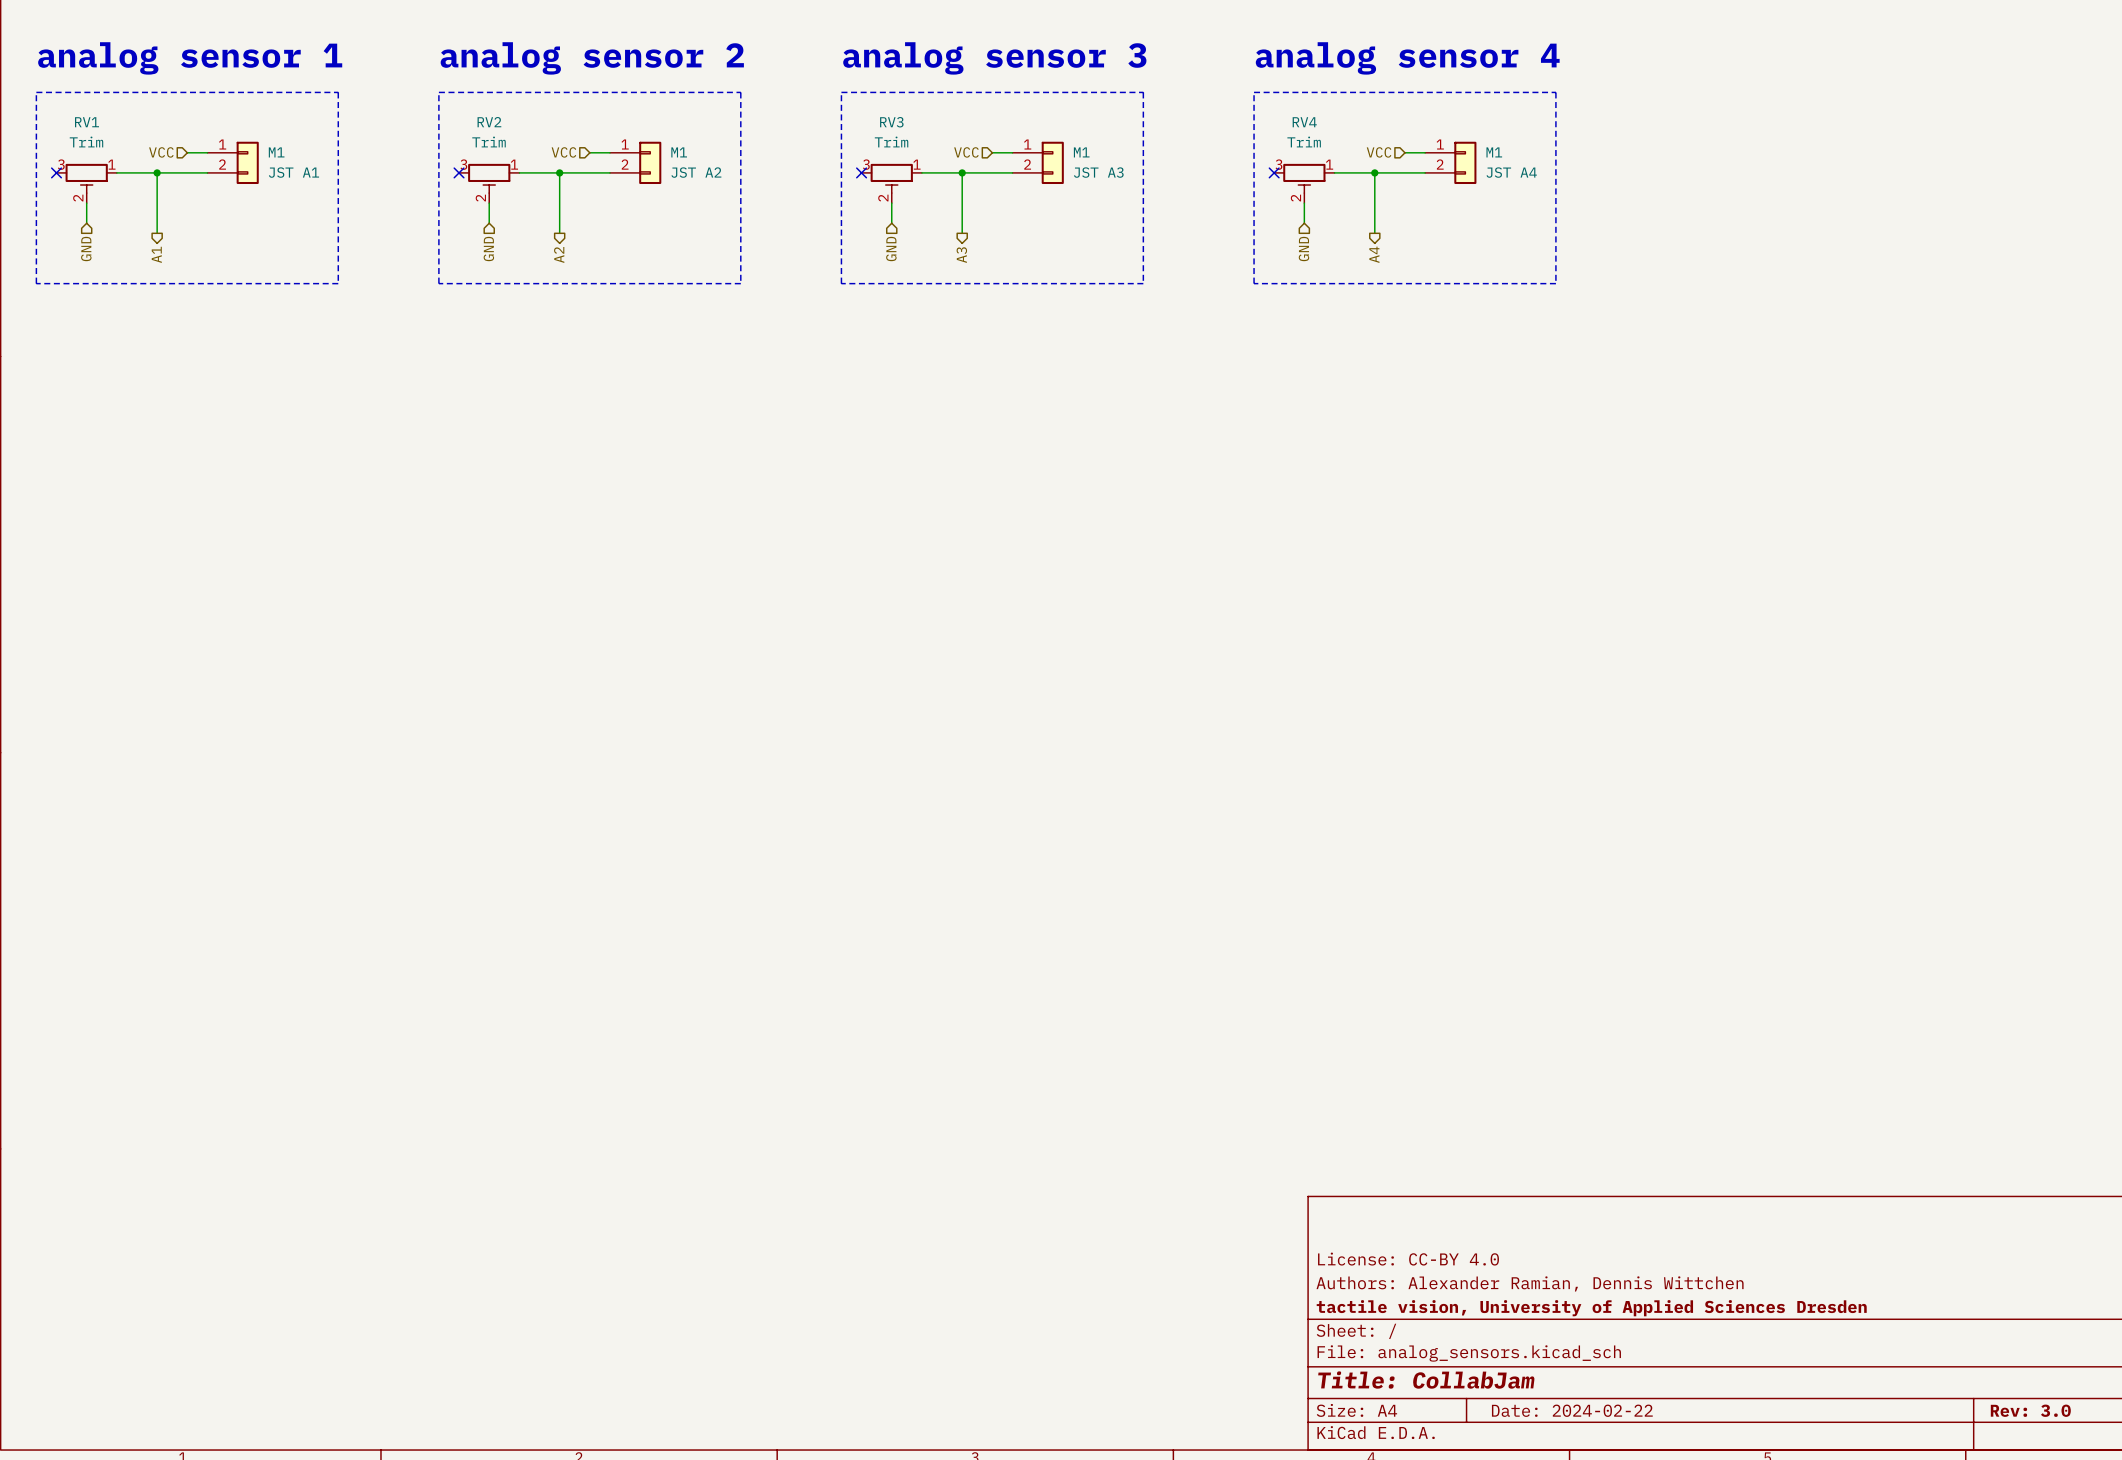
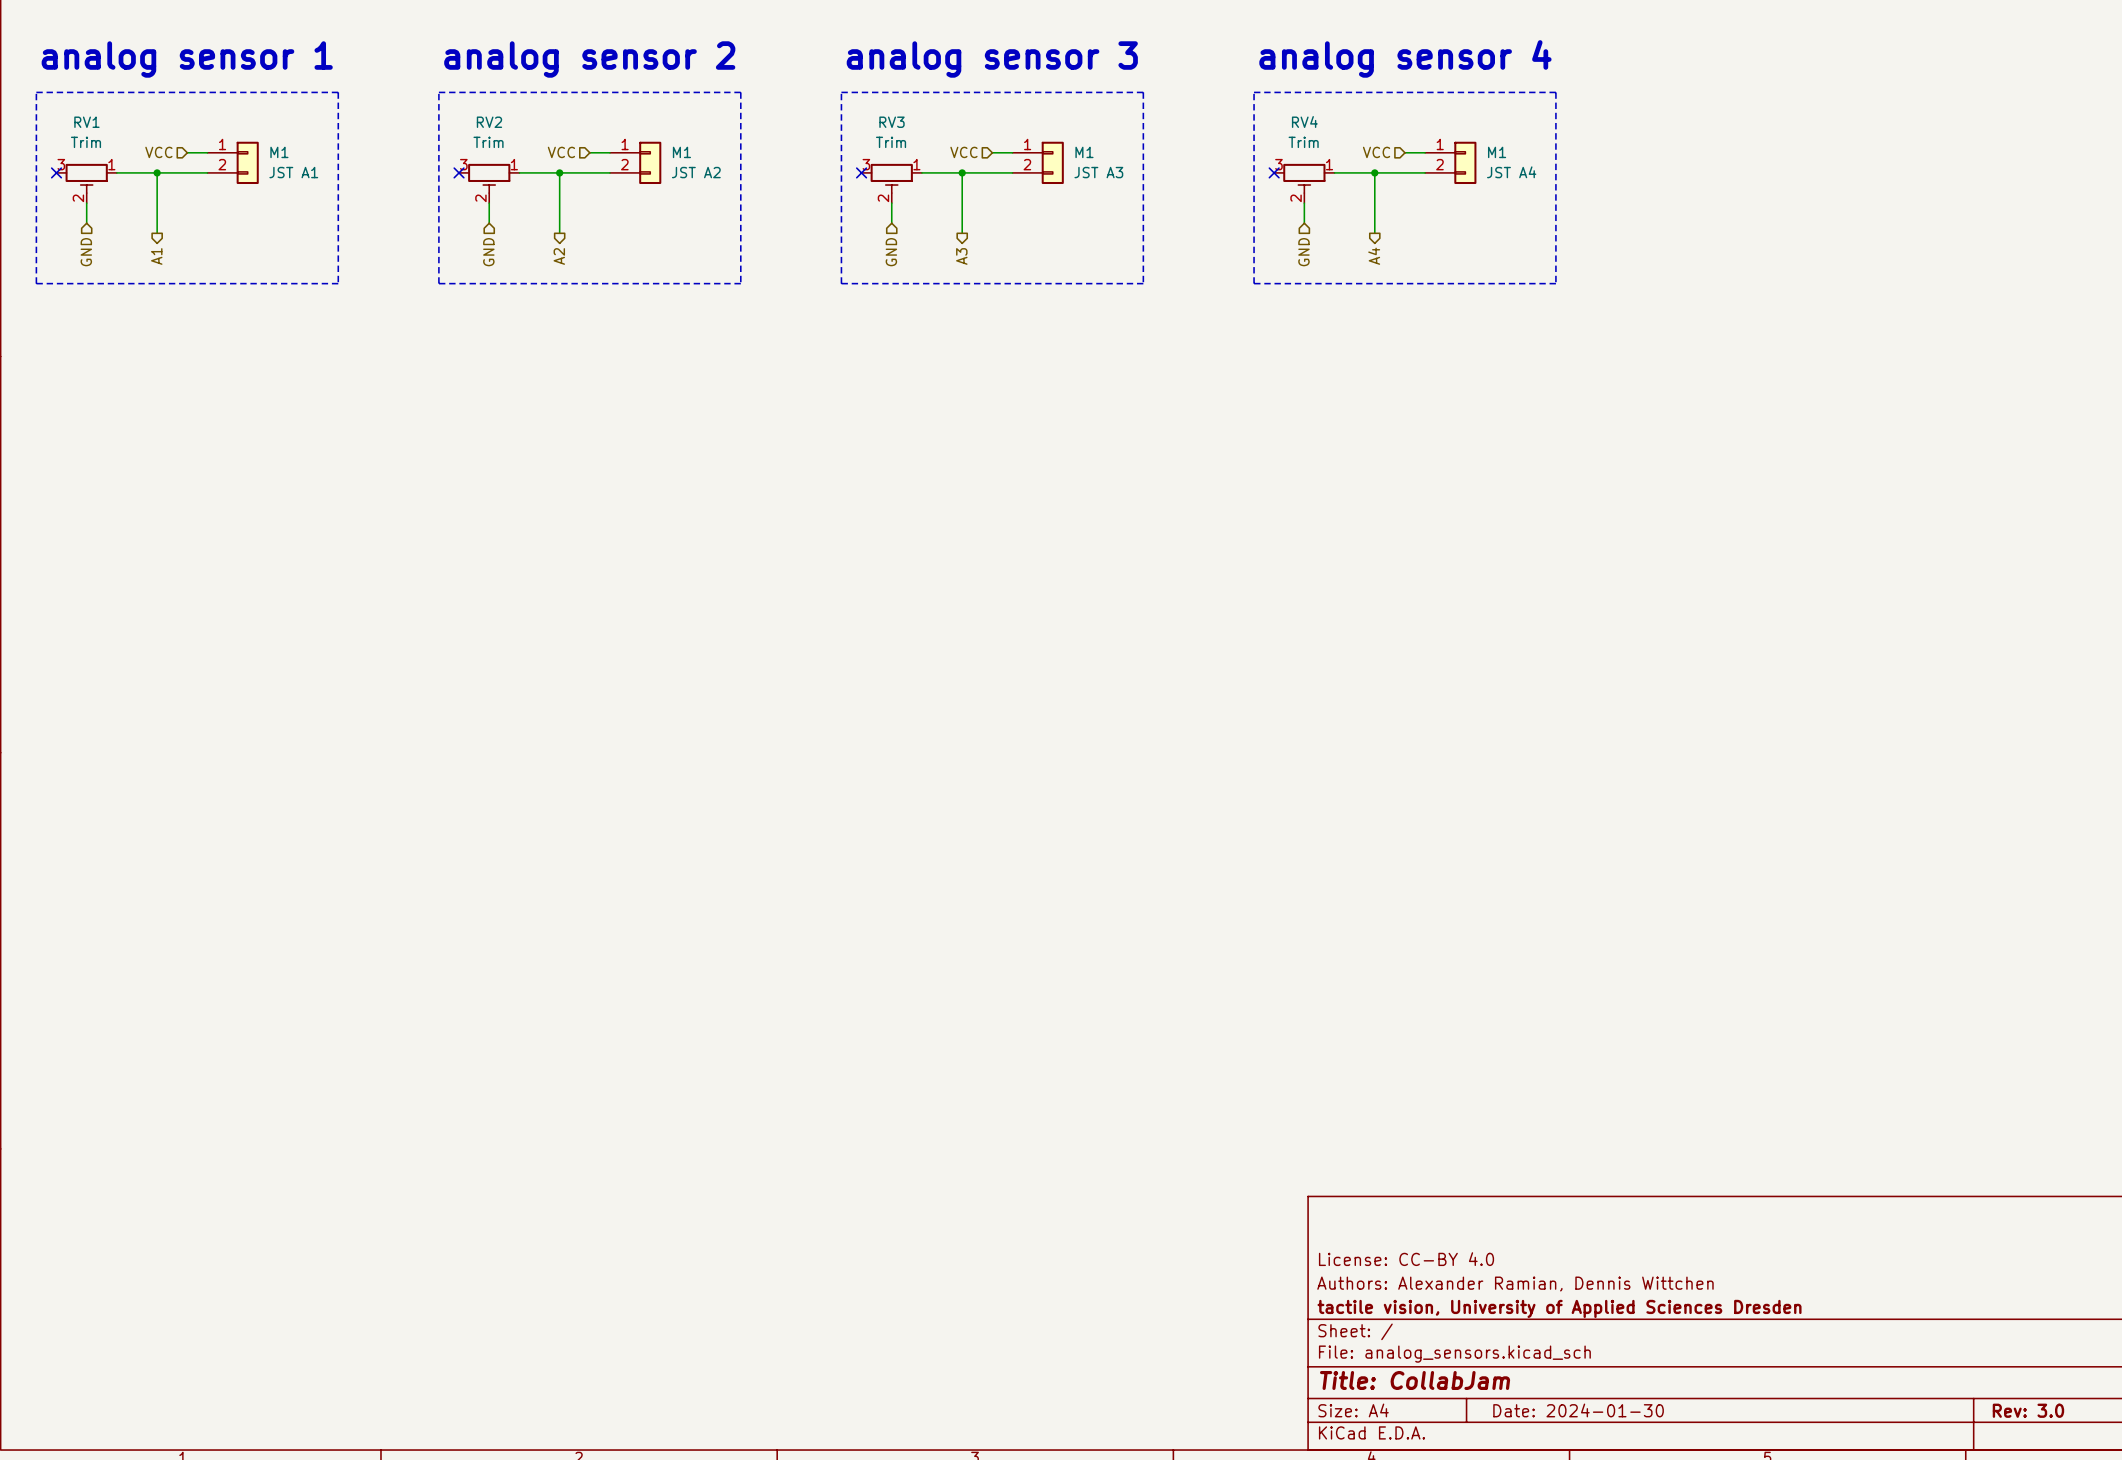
title block: Date: 2024-02-22 (1572, 1410) -> Date: 2024-01-30 (1578, 1410)

